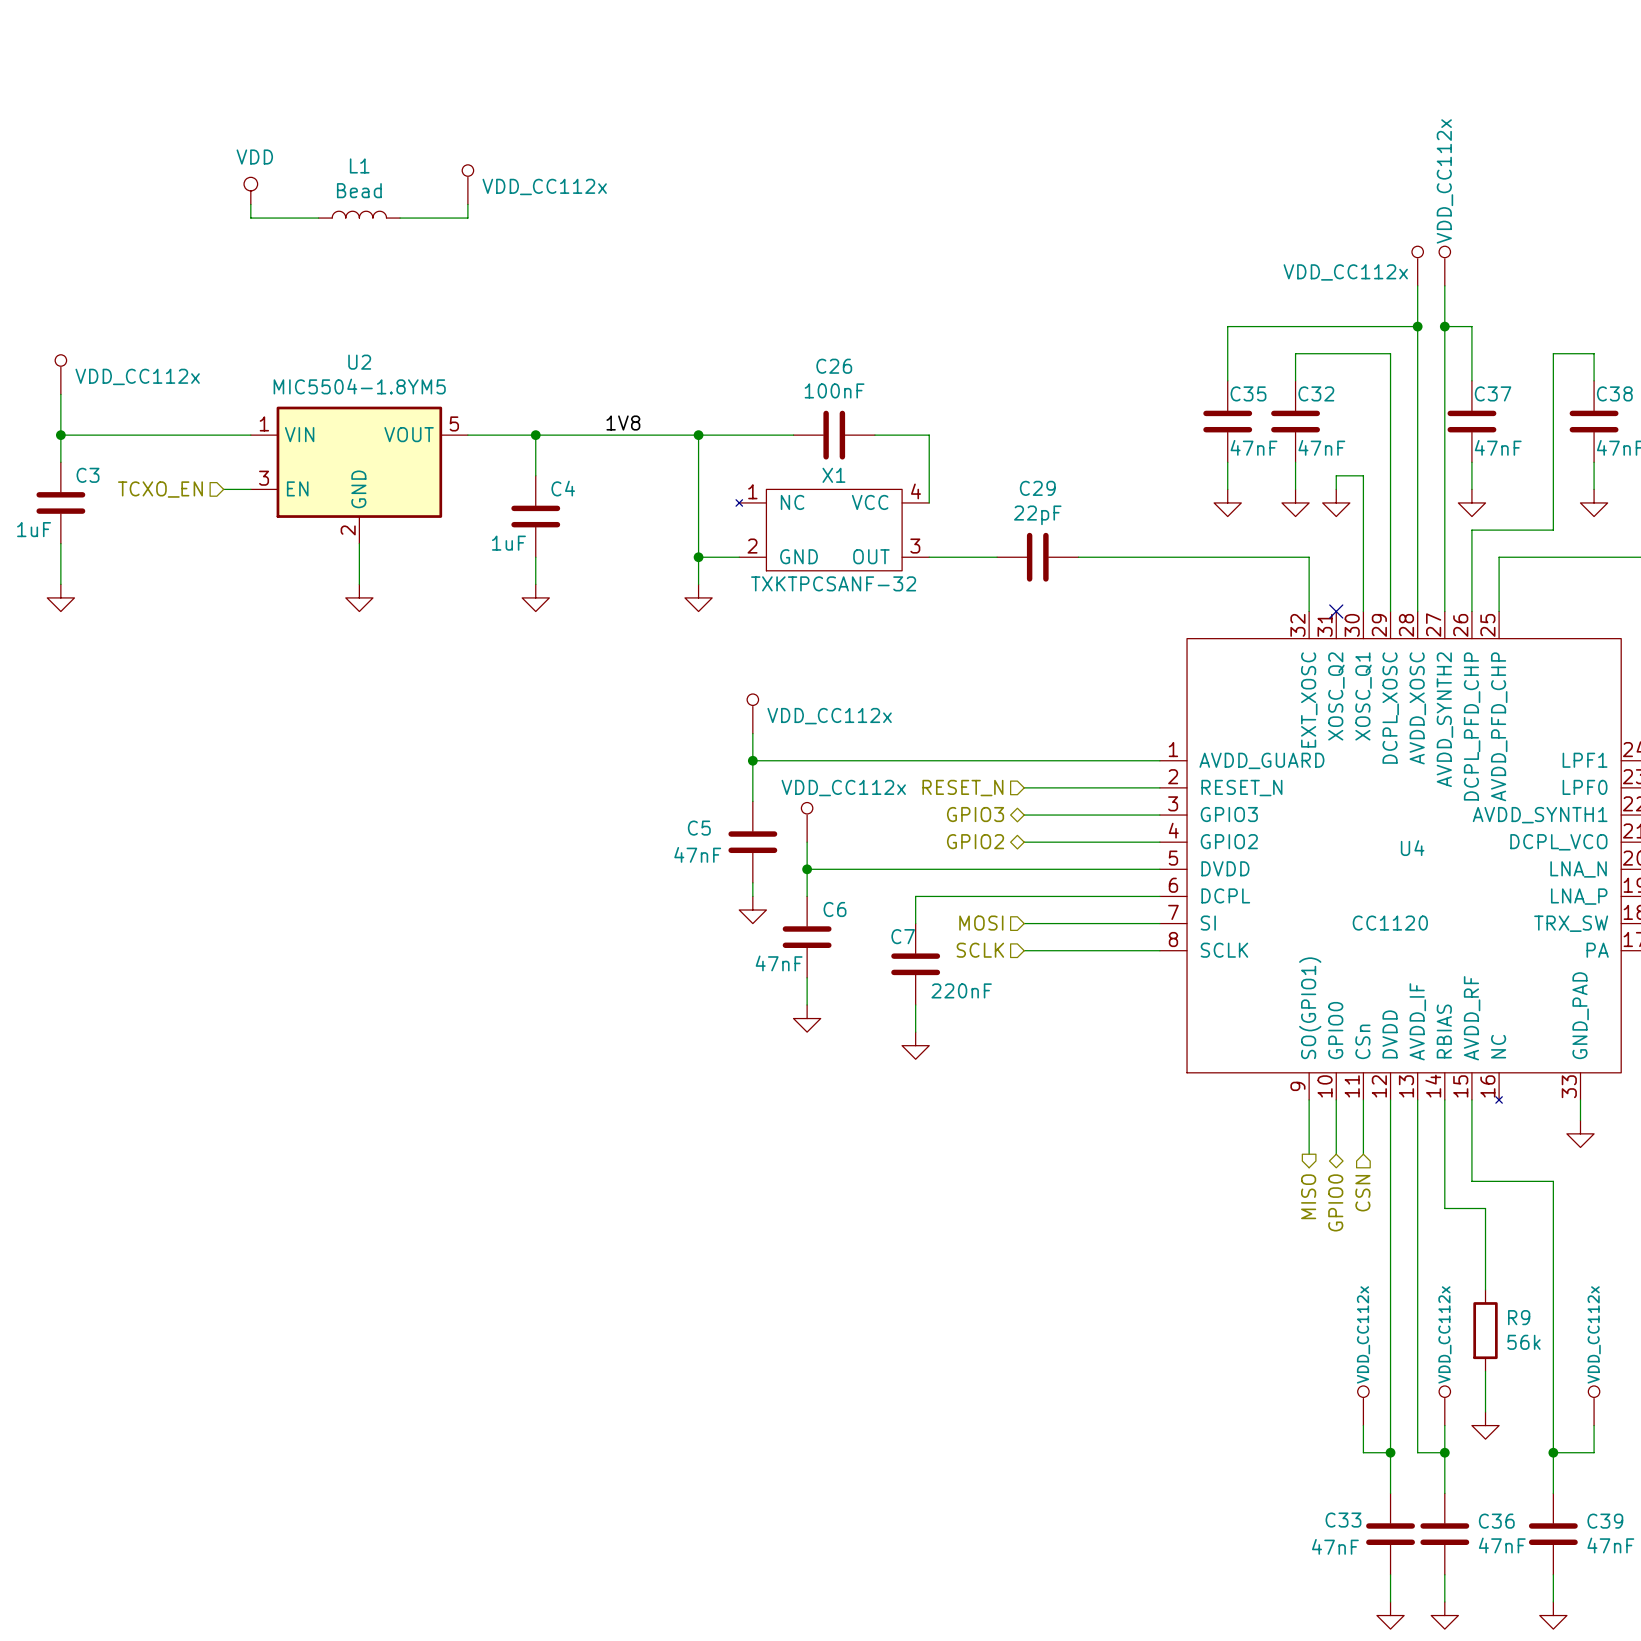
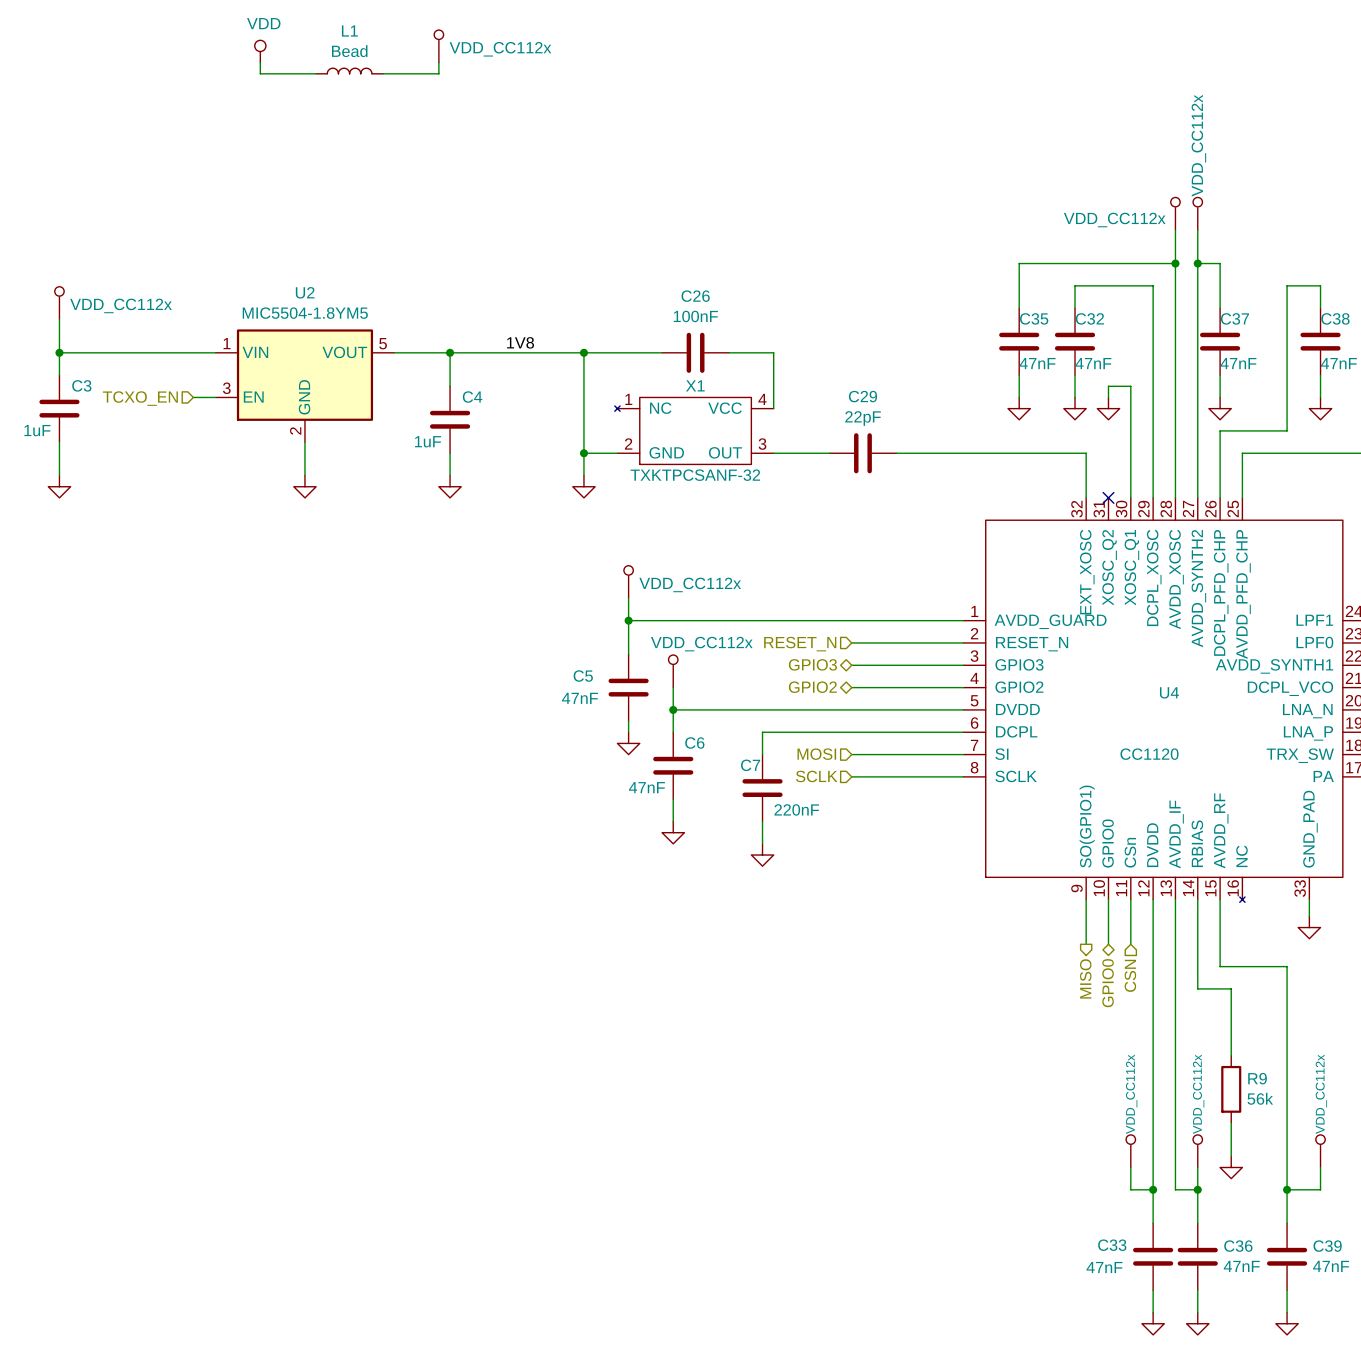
power symbol position: VDD_CC112x (467, 184) -> VDD_CC112x (438, 46)
power symbol position: VDD (250, 190) -> VDD (260, 51)
wire: (250, 204) (250, 218) (318, 218) -> (260, 62) (260, 73) (316, 73)
wire: (467, 204) (467, 218) (400, 218) -> (438, 62) (438, 73) (383, 73)
L1 position: (359, 214) -> (349, 71)

